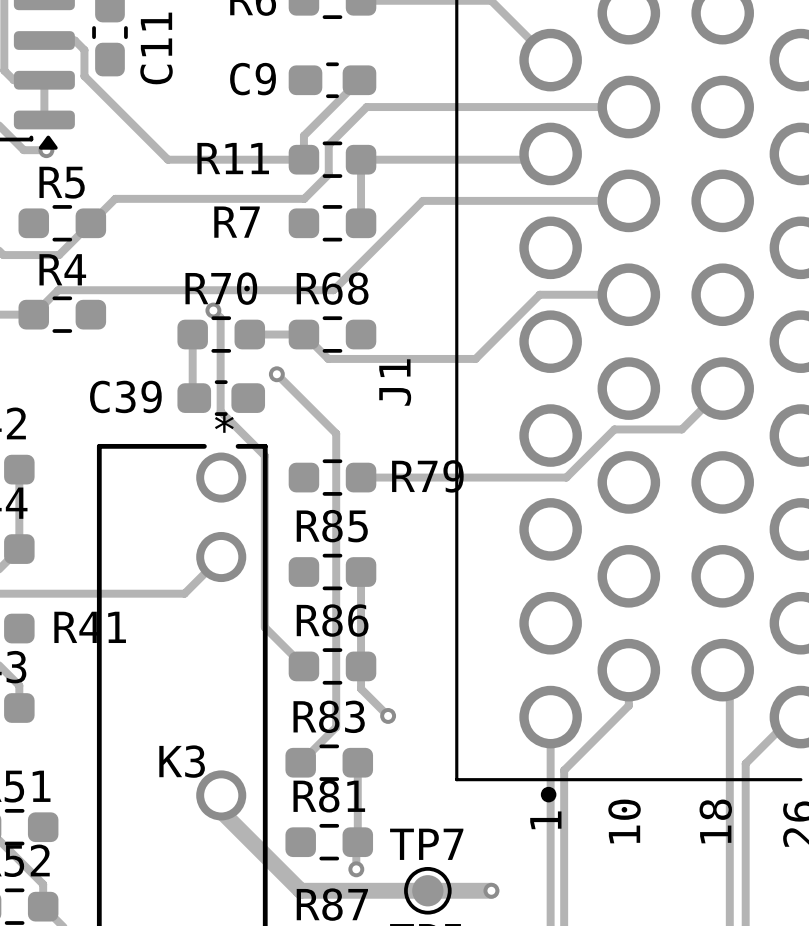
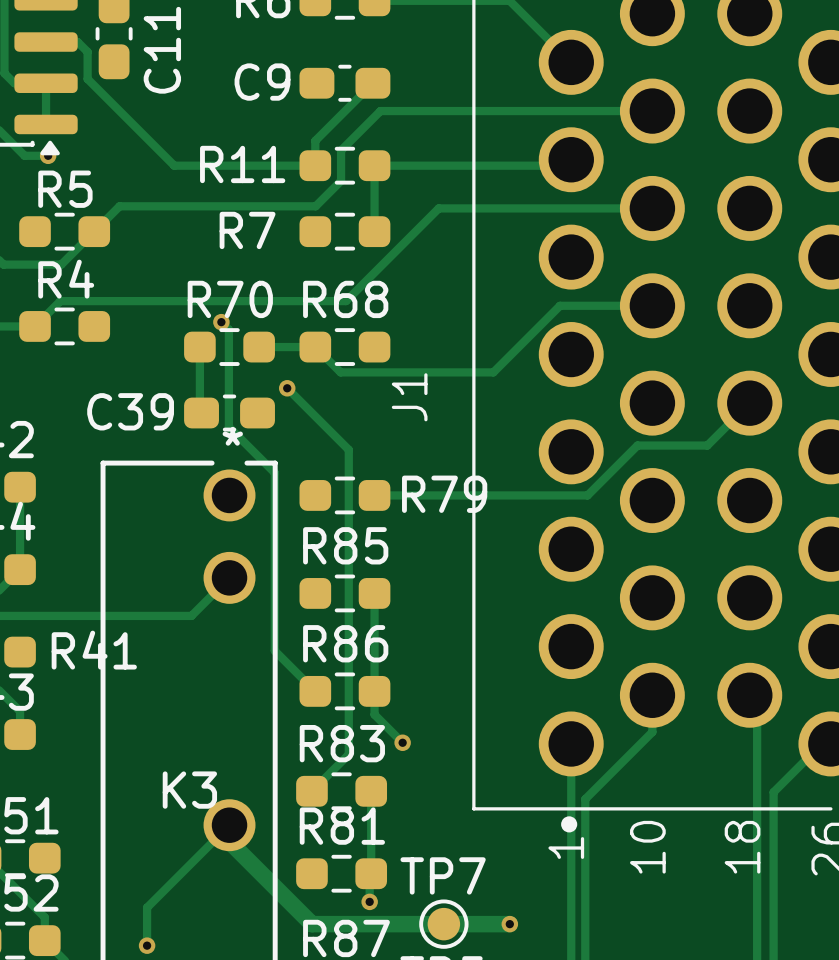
track: none -> (229, 825) (147, 907) (147, 945)
via: none -> (147, 945)

